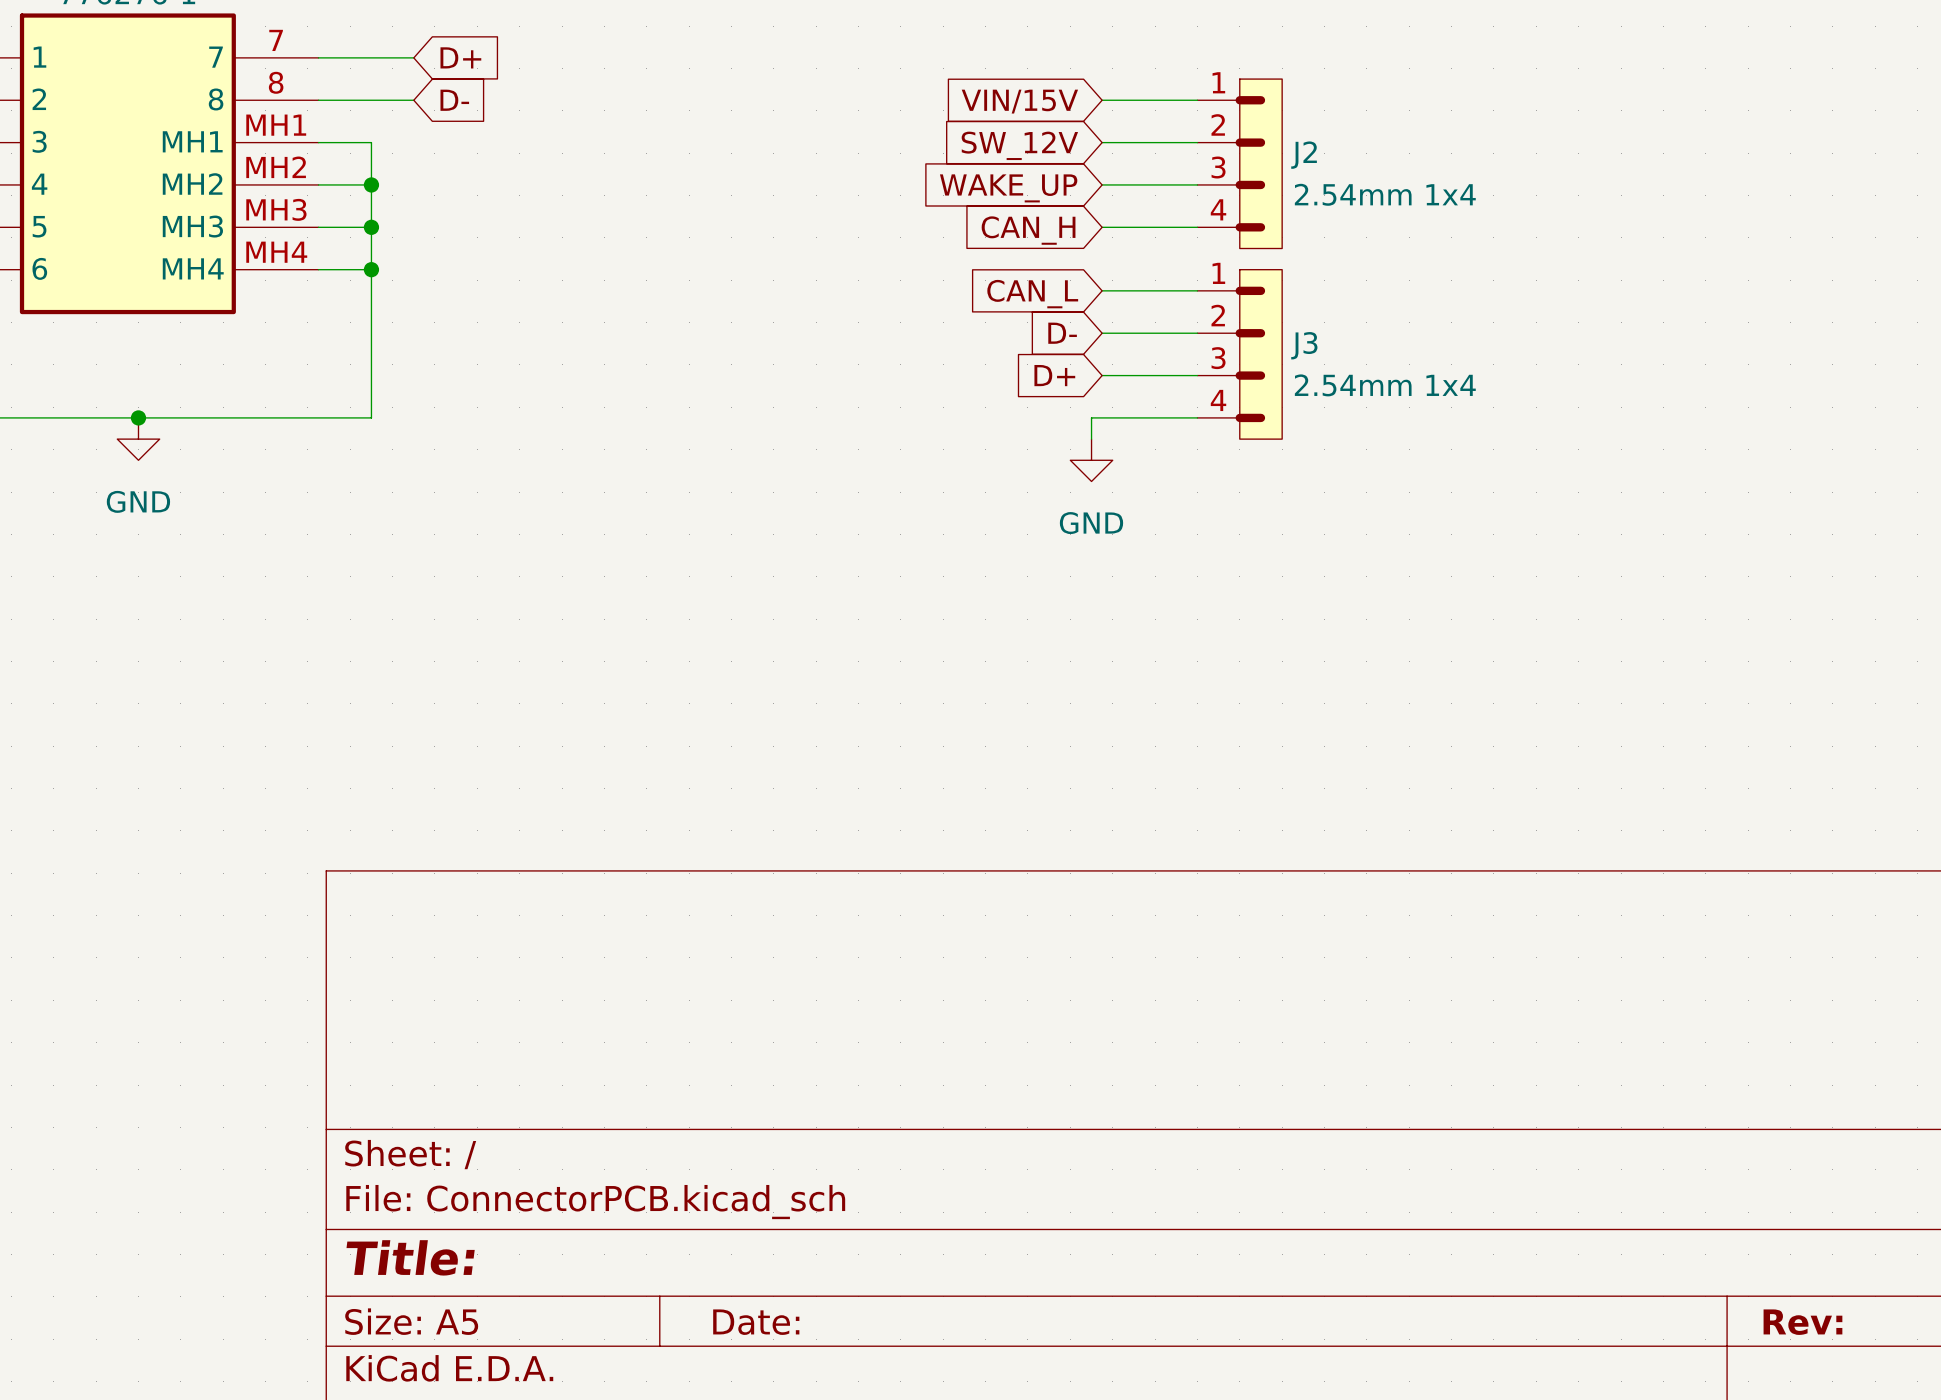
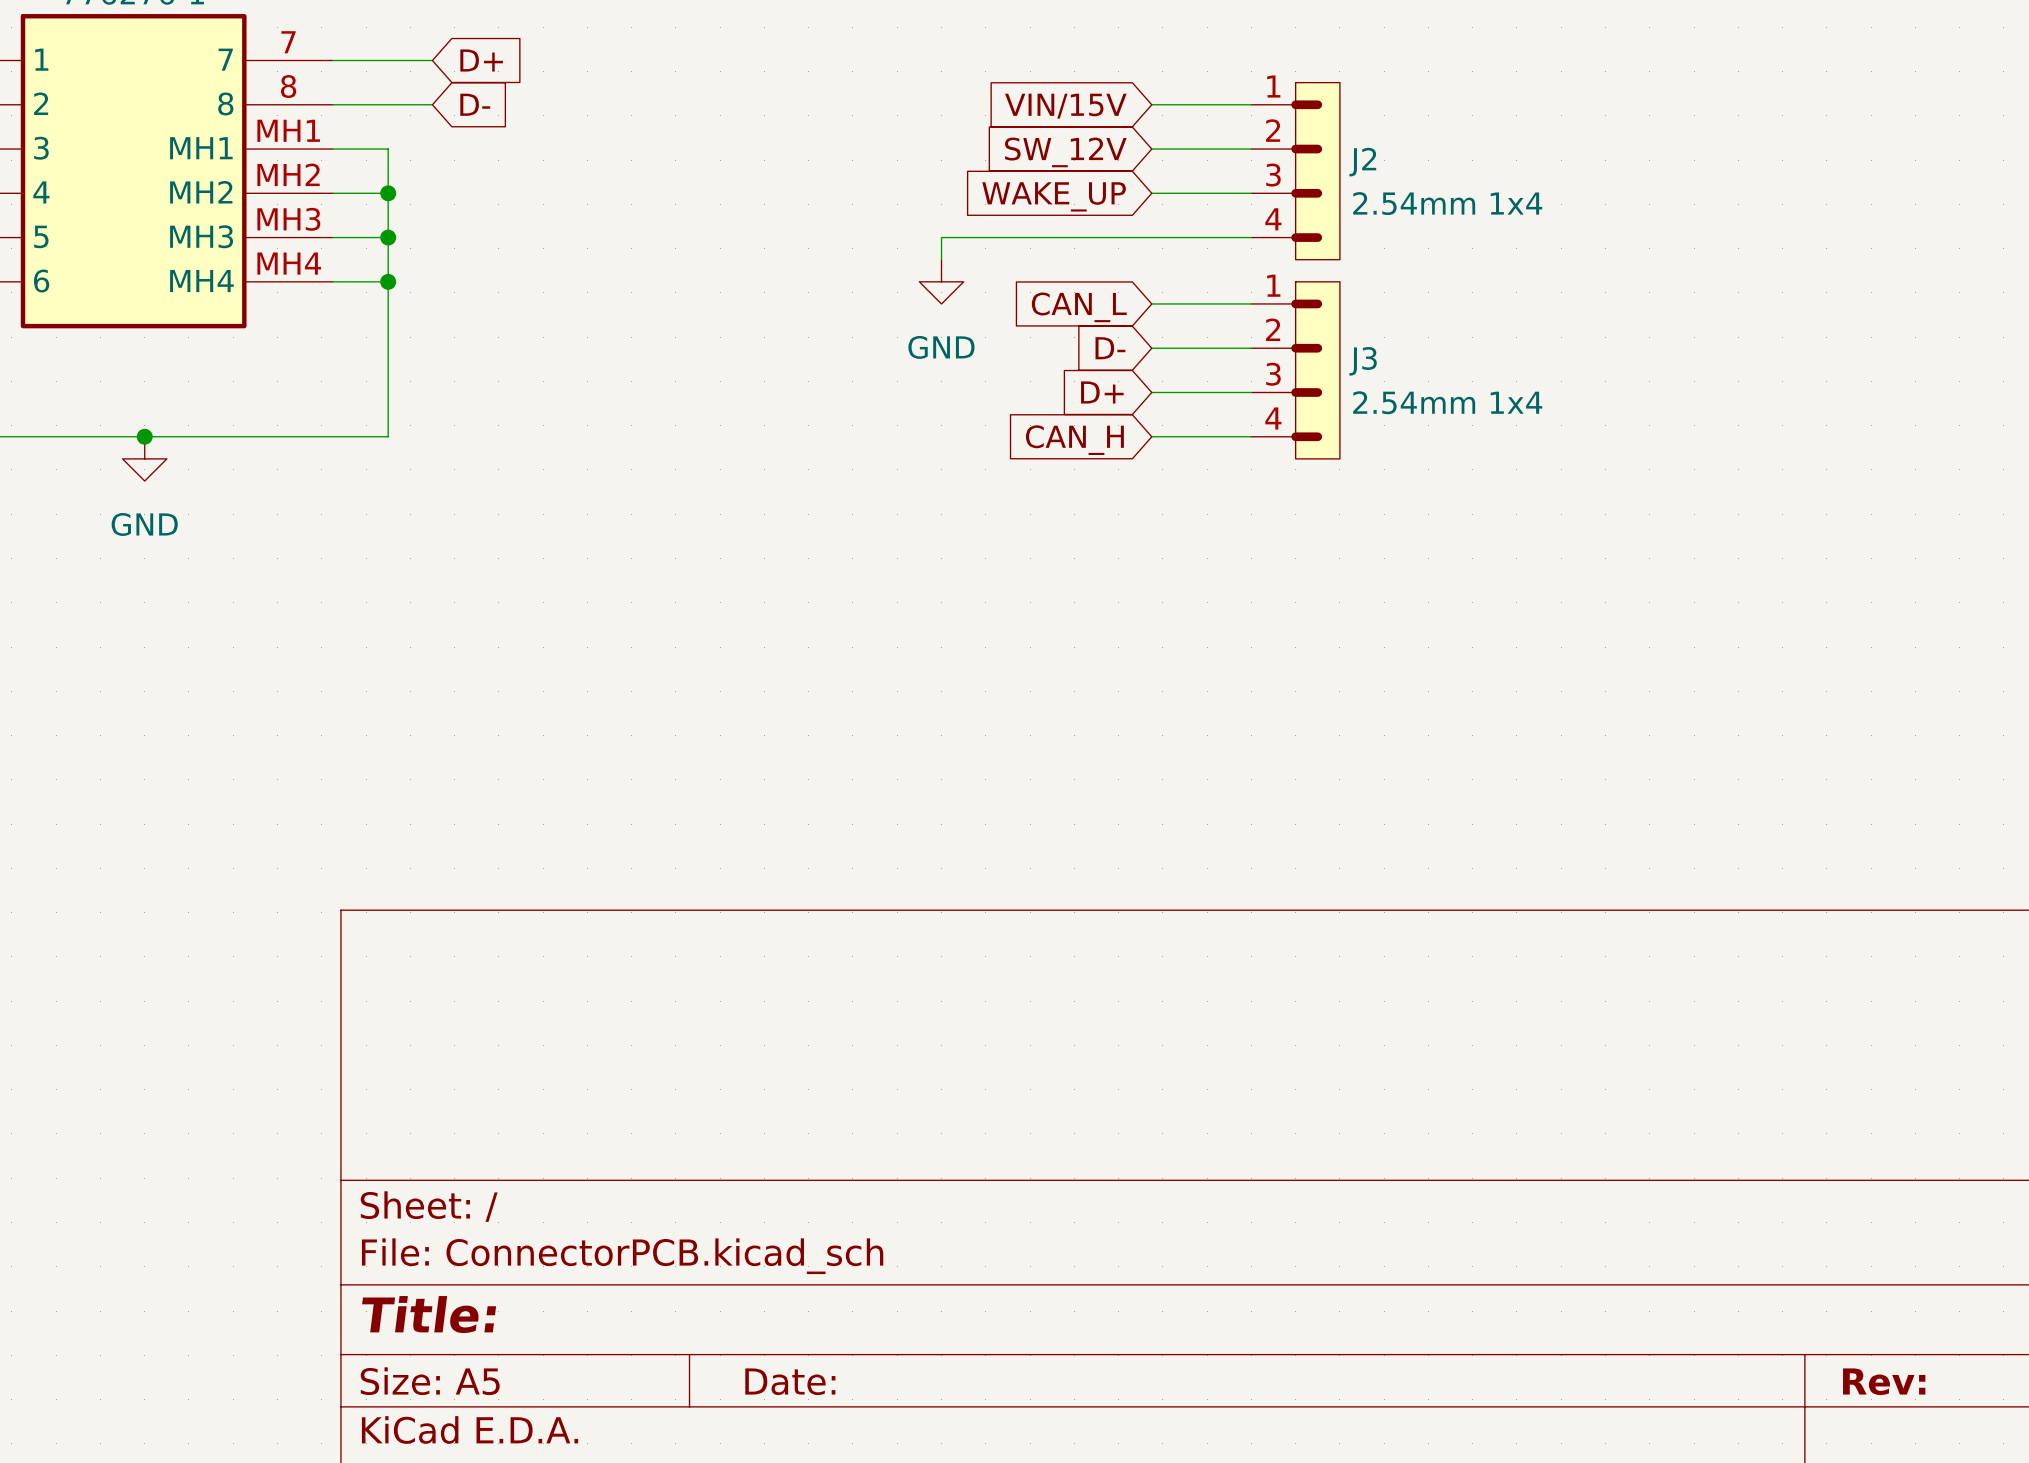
wire: none -> (1151, 237) (941, 237) (941, 259)
global label position: CAN_H (1028, 230) -> CAN_H (1074, 440)
wire: (1102, 417) (1091, 417) (1091, 439) -> none
power symbol position: GND (1091, 460) -> GND (941, 281)

